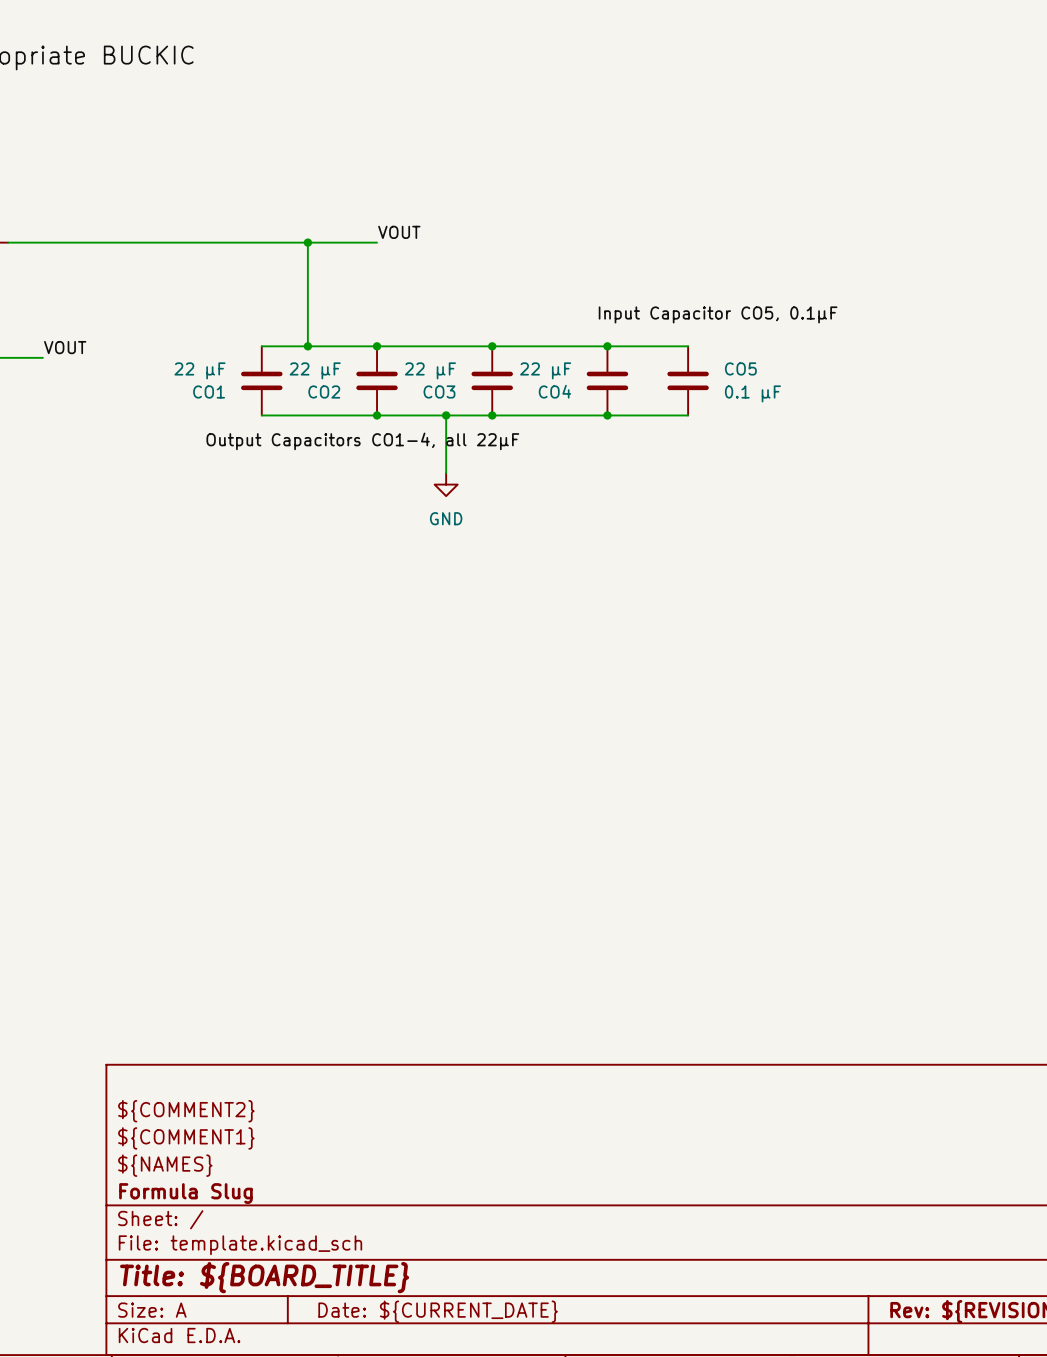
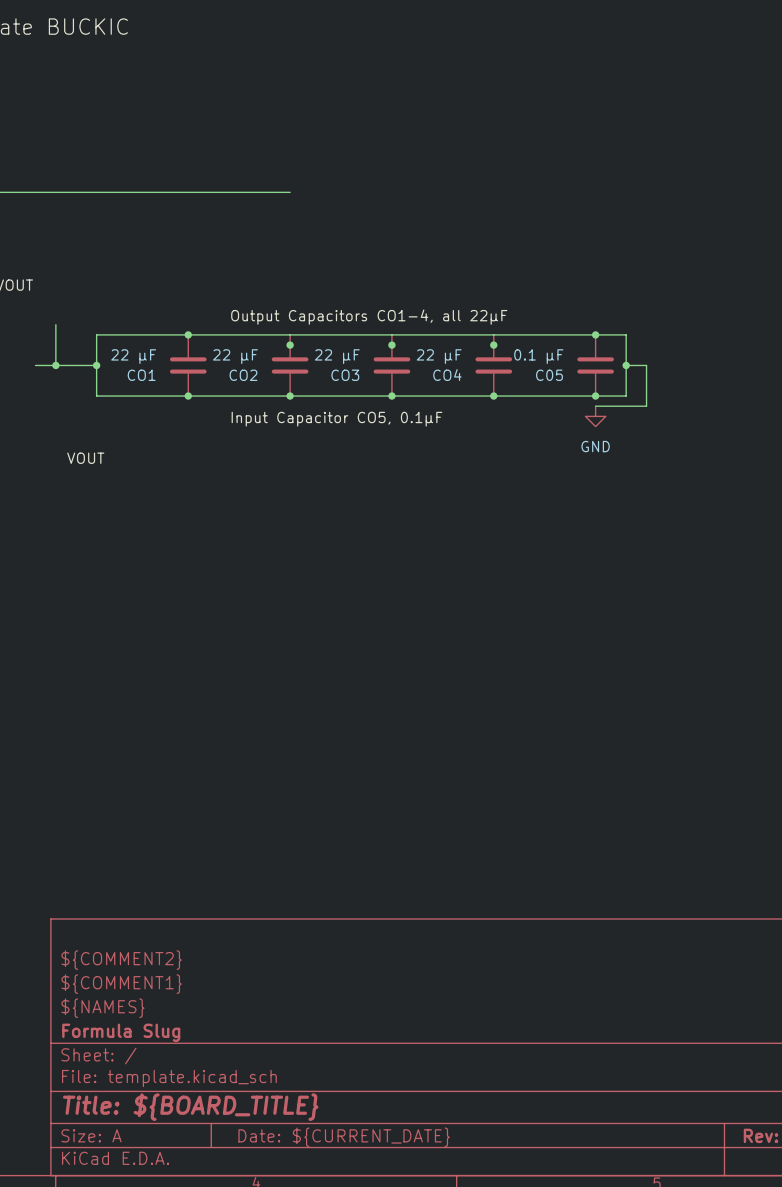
label: VOUT (399, 232) -> none
wire: (307, 242) (307, 346) -> none
junction: (307, 242) -> none
label: Input Capacitor CO5, 0.1μF (718, 314) -> none
wire: (261, 346) (688, 346) -> none
junction: (307, 346) -> none
junction: (377, 346) -> none
junction: (492, 346) -> none
junction: (607, 346) -> none
CO1 position: (261, 380) -> (188, 365)
CO2 position: (377, 380) -> (290, 365)
CO3 position: (492, 380) -> (391, 365)
CO4 position: (607, 380) -> (493, 365)
CO5: 0.1 µF (688, 380) -> none
wire: none -> (55, 324) (55, 365)
wire: none -> (96, 334) (626, 334) (626, 396) (96, 396) (96, 334)
junction: none -> (188, 334)
junction: none -> (595, 334)
wire: (261, 415) (688, 415) -> none
wire: (446, 415) (446, 473) -> none
junction: (446, 415) -> none
wire: none -> (35, 365) (96, 365)
junction: none -> (55, 365)
junction: none -> (96, 365)
C05: none -> 0.1 µF (595, 365)
wire: none -> (626, 365) (646, 365) (646, 406) (595, 406)
junction: none -> (626, 365)
label position: Output Capacitors CO1-4, all 22μF (362, 441) -> Output Capacitors CO1-4, all 22μF (369, 317)
junction: none -> (188, 396)
junction: none -> (290, 396)
junction: none -> (391, 396)
junction: none -> (493, 396)
junction: none -> (595, 396)
power symbol: GND (446, 484) -> none
power symbol: none -> GND (595, 416)
label: none -> Input Capacitor CO5, 0.1μF (336, 419)
label: none -> VOUT (85, 458)

